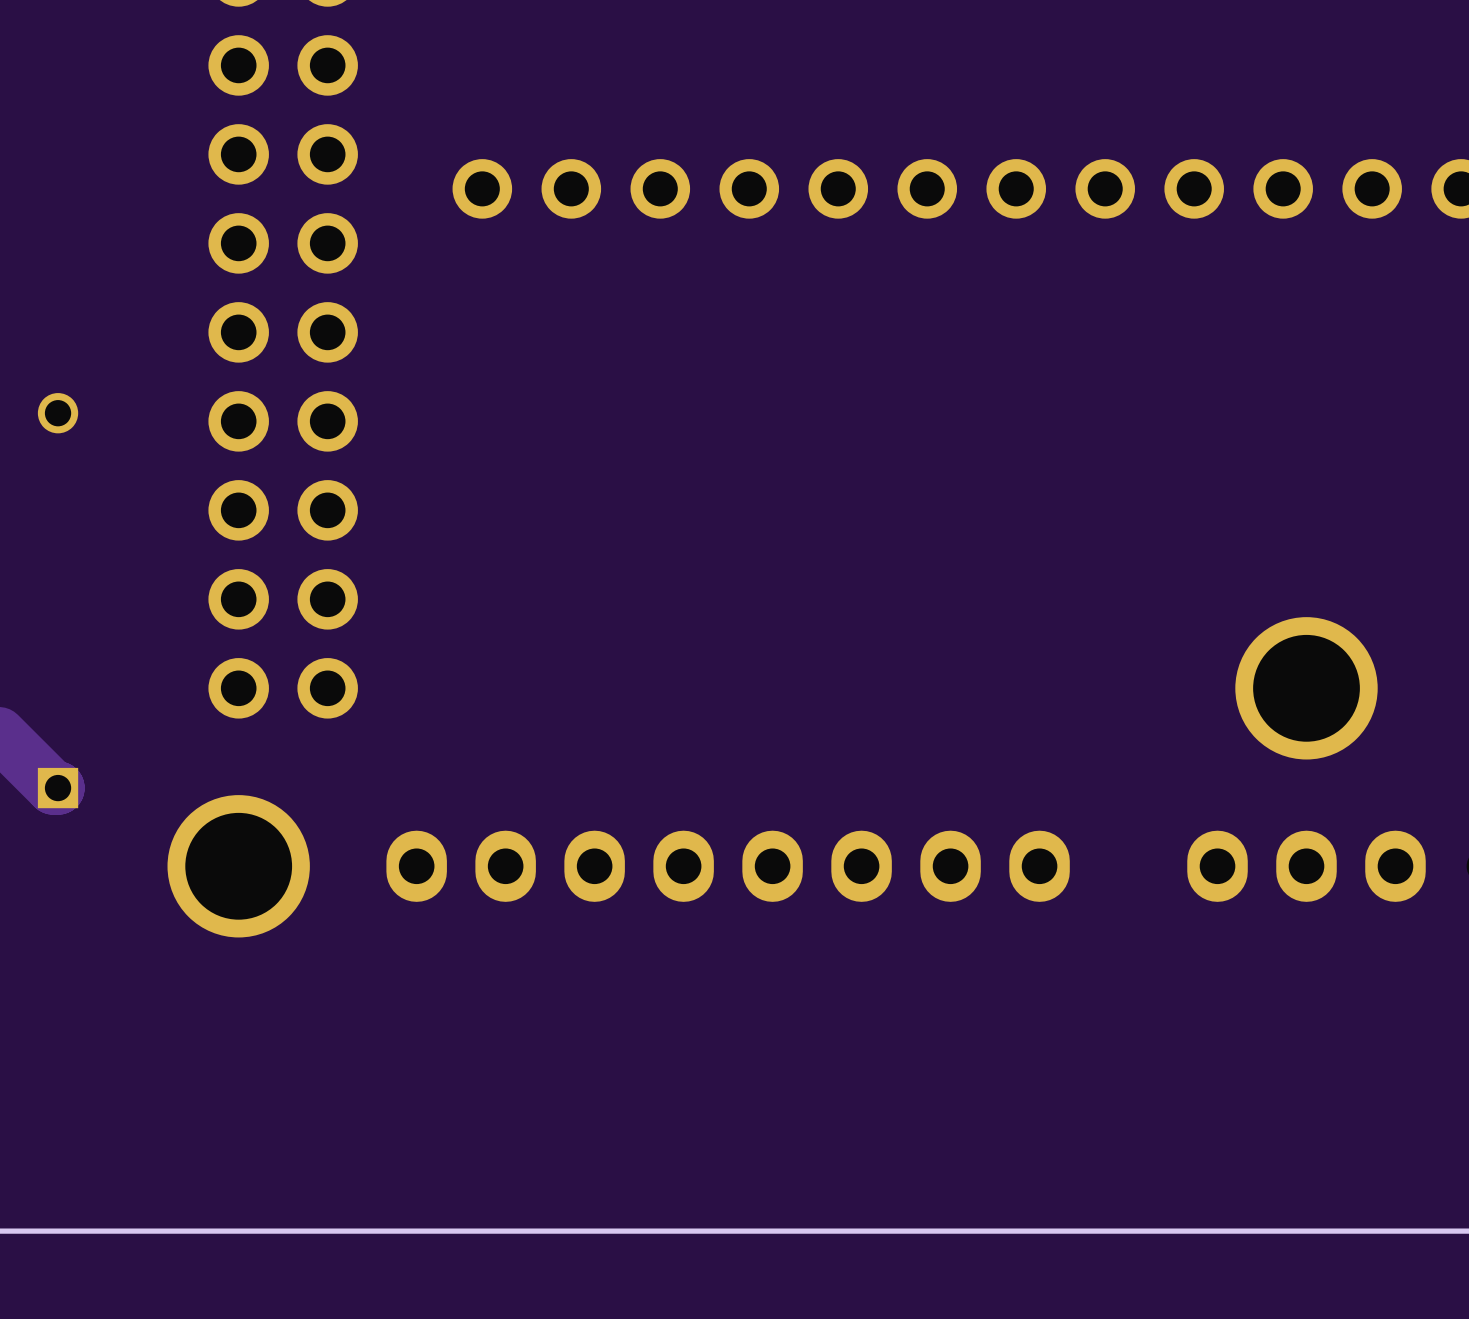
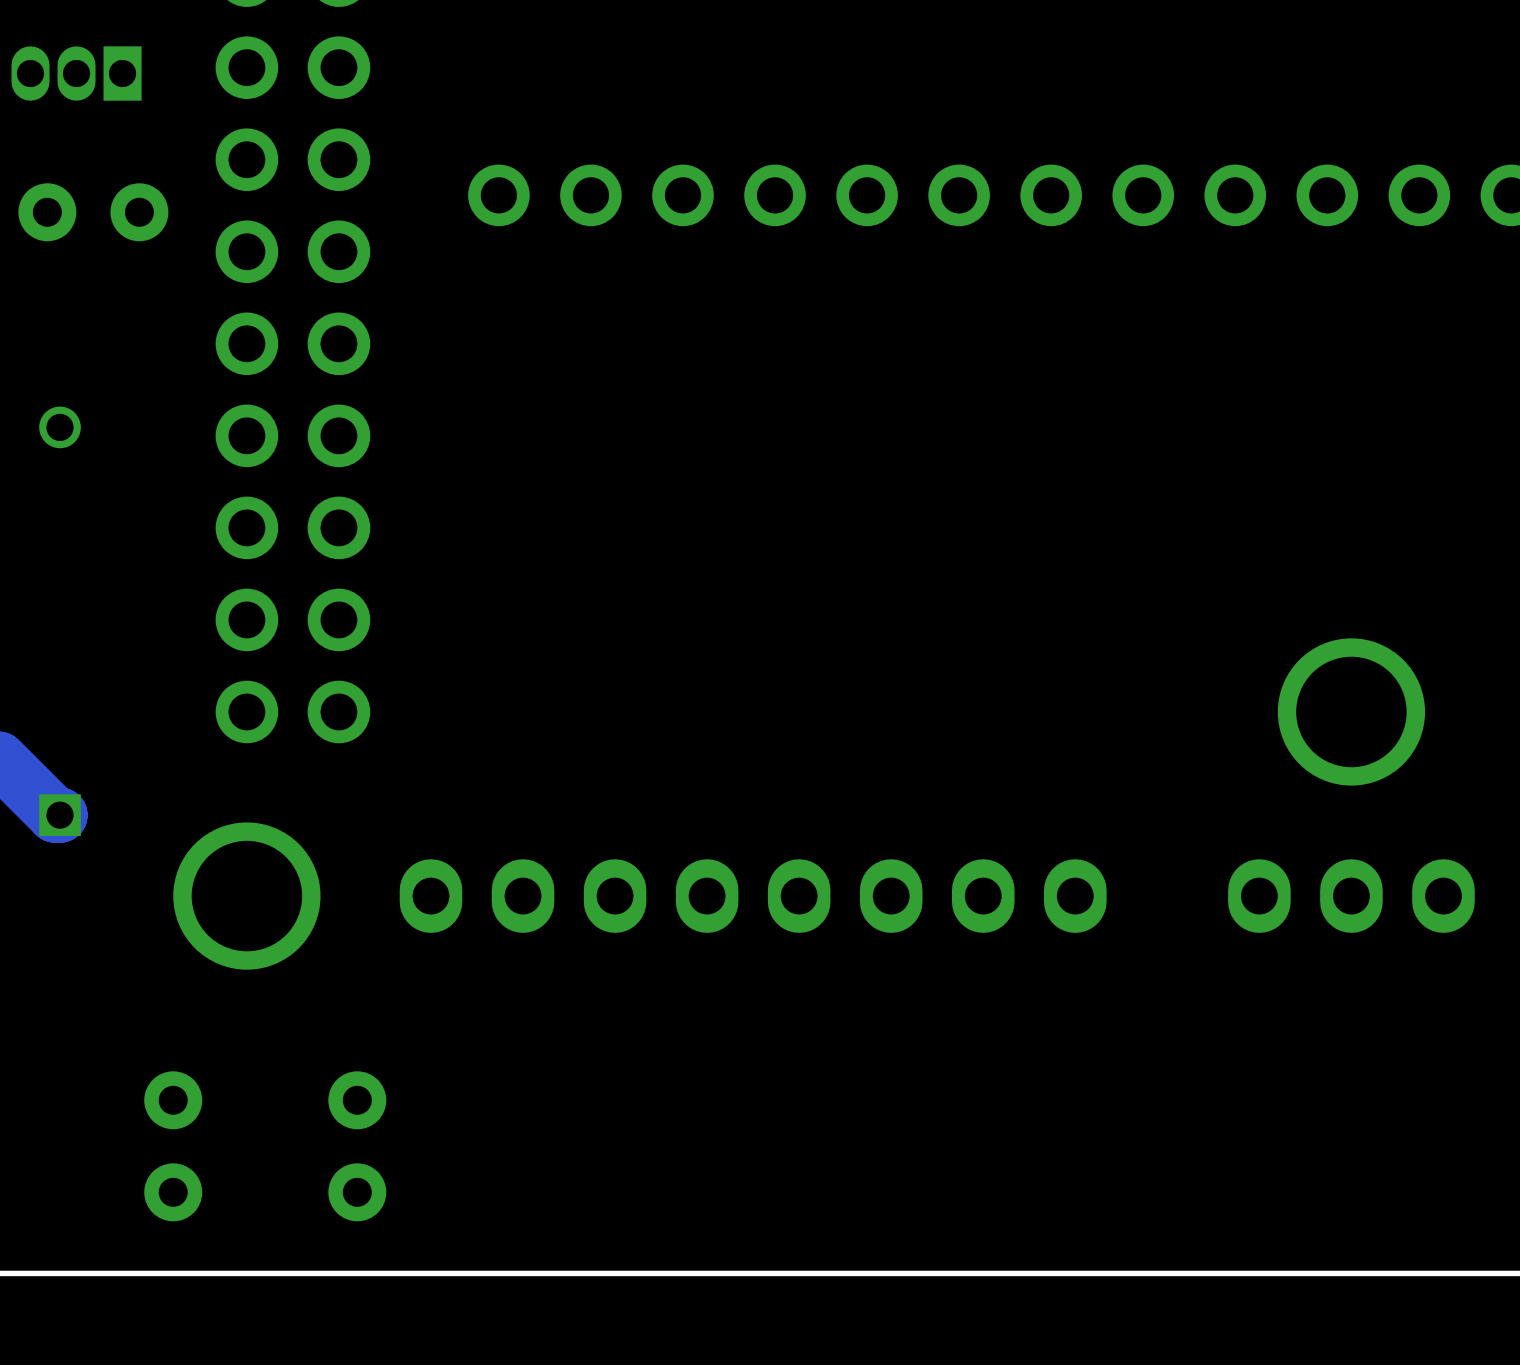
part: none -> (76, 73)
part: none -> (93, 212)
part: none -> (173, 1146)
part: none -> (357, 1146)

